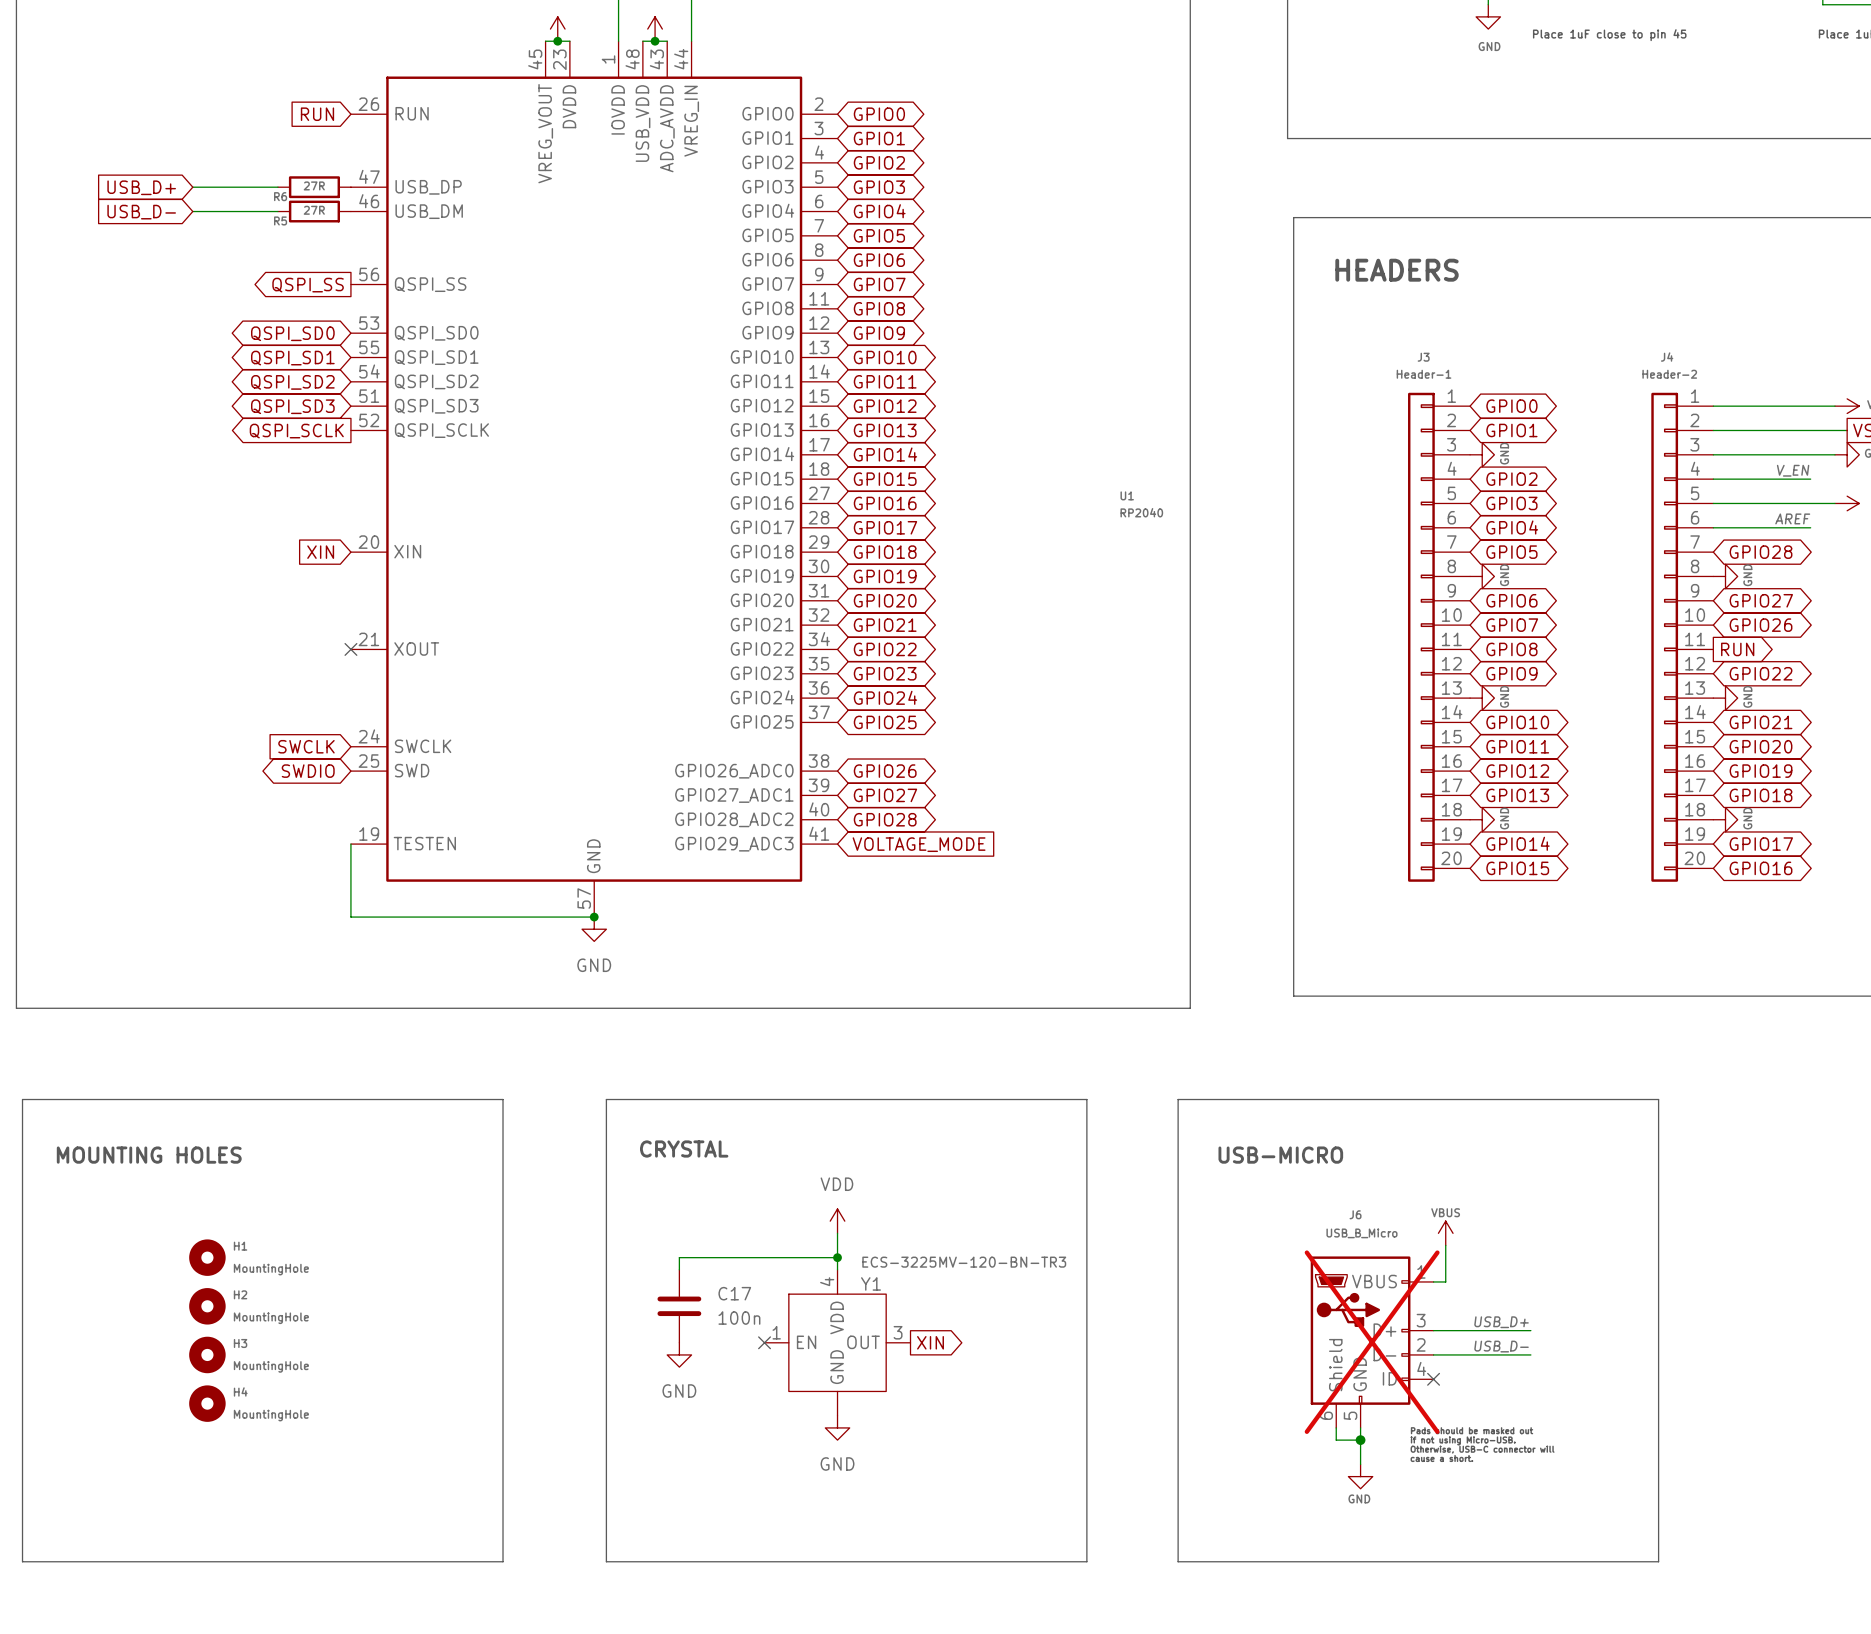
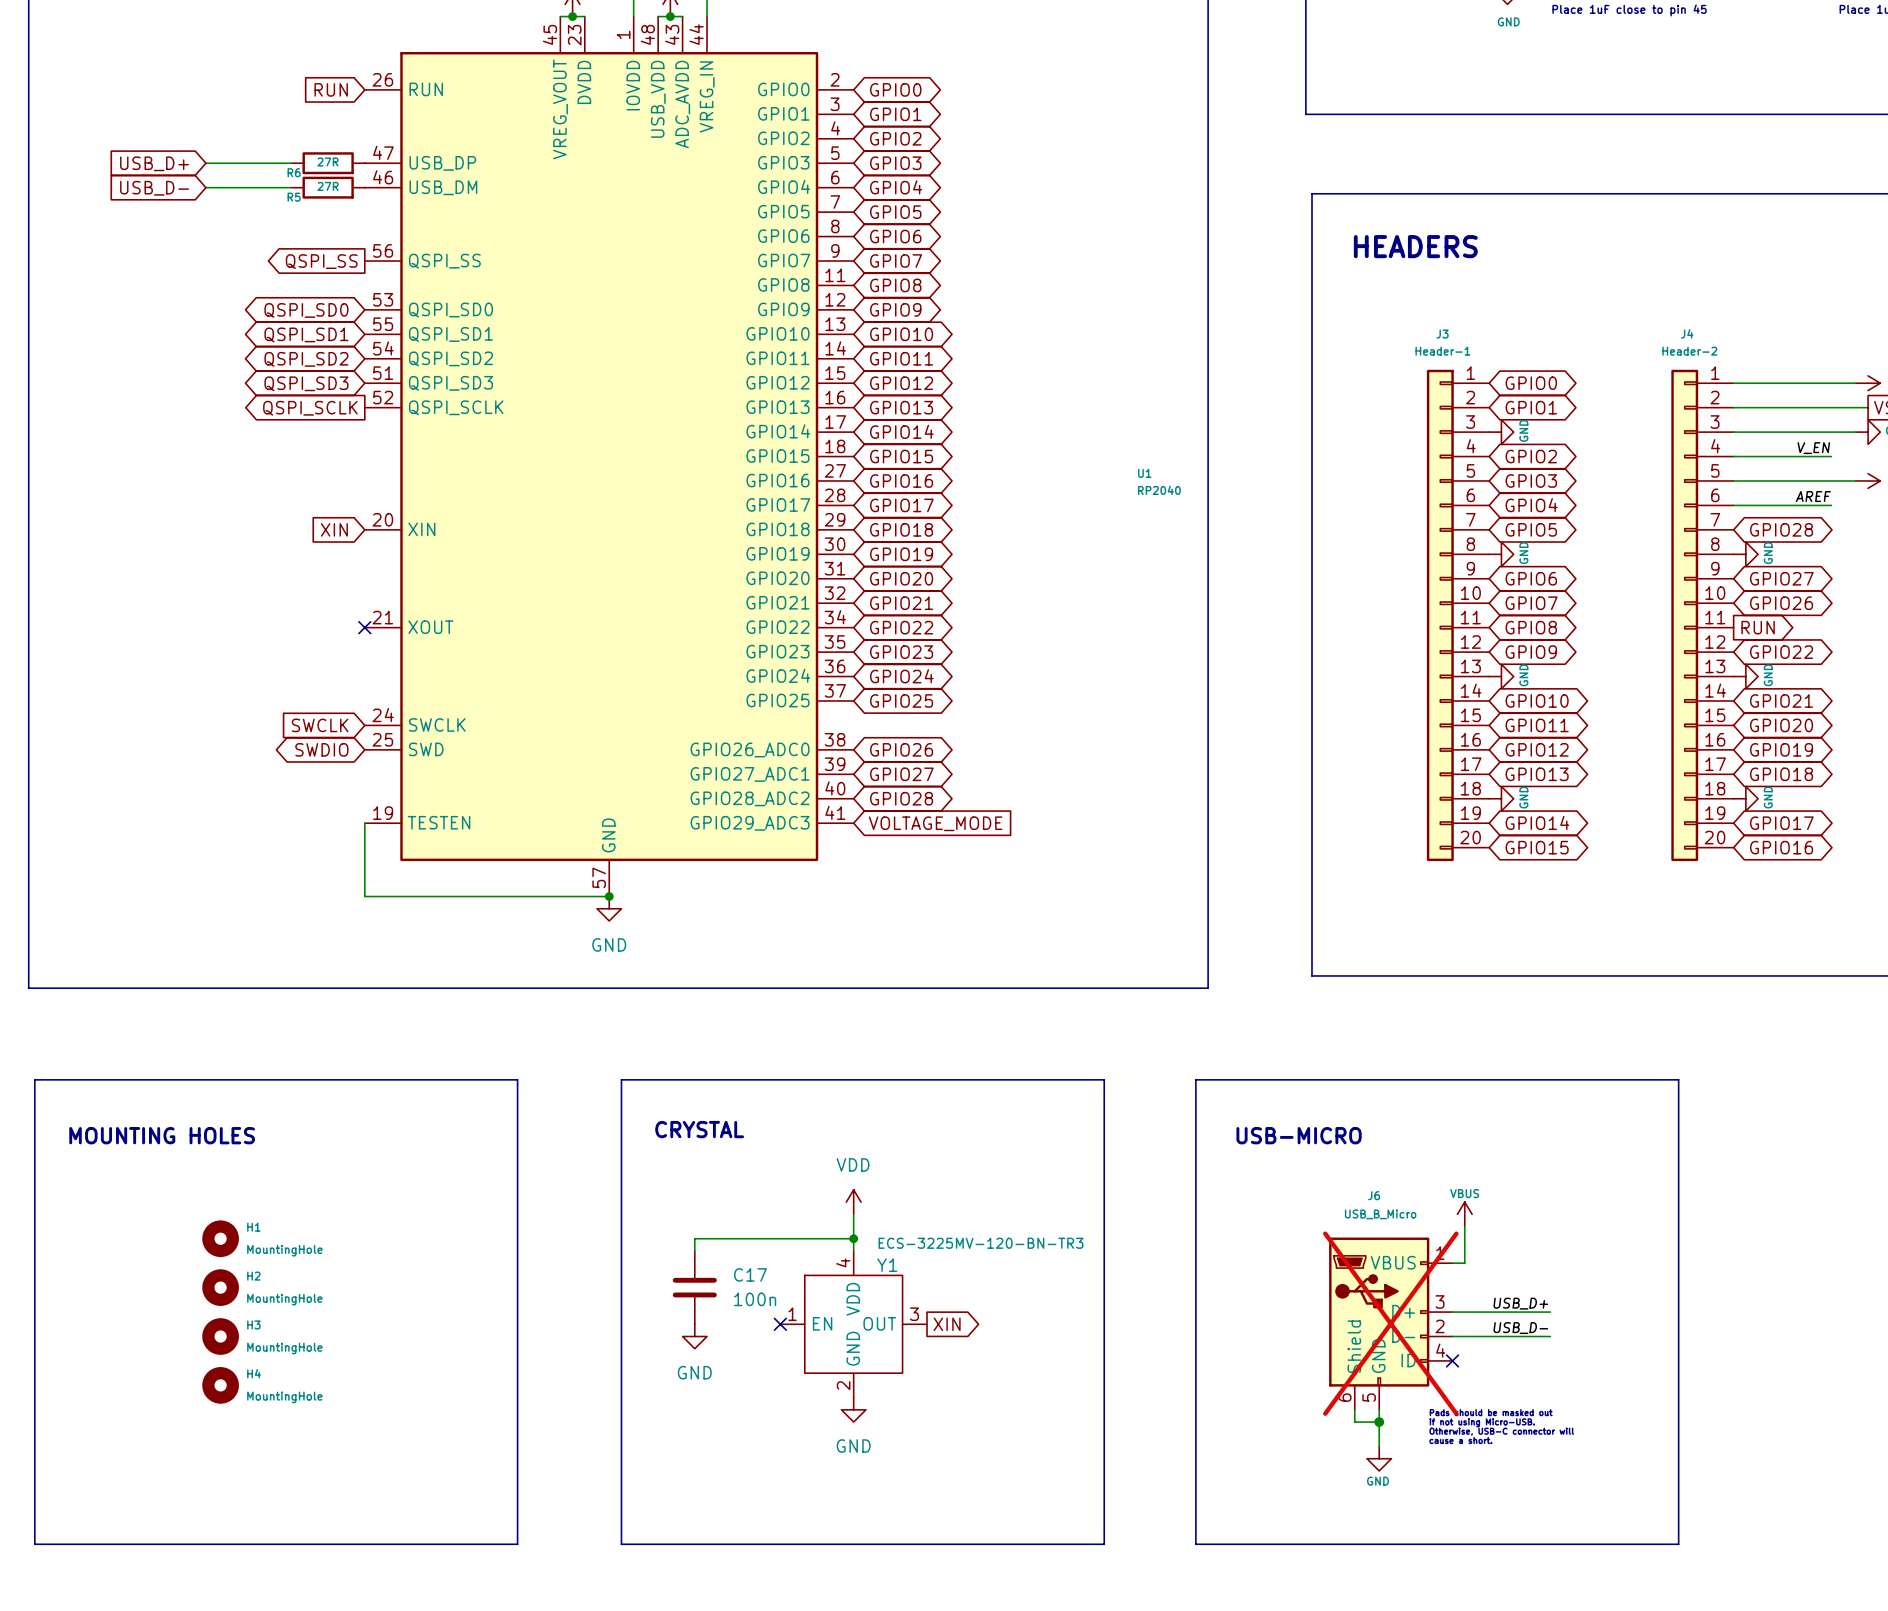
Y1 pin number: none -> 2 (843, 1385)

